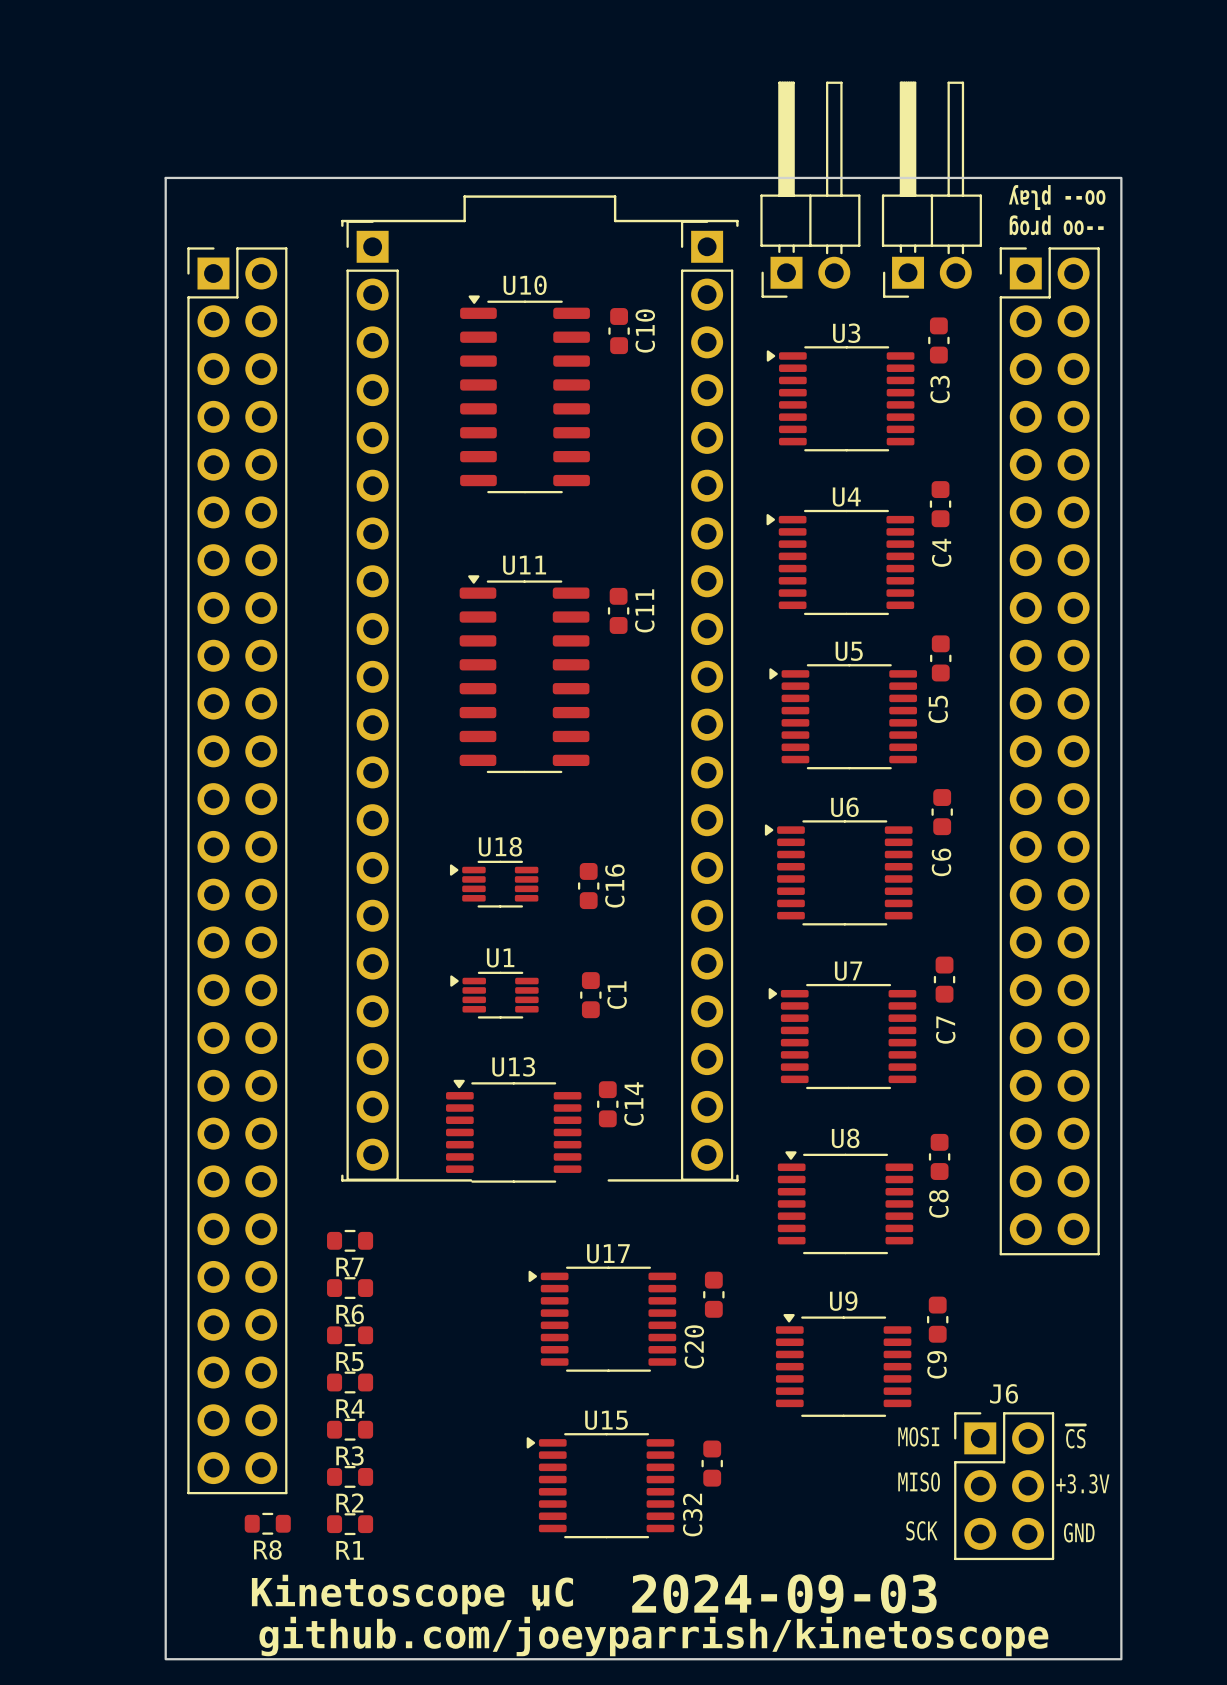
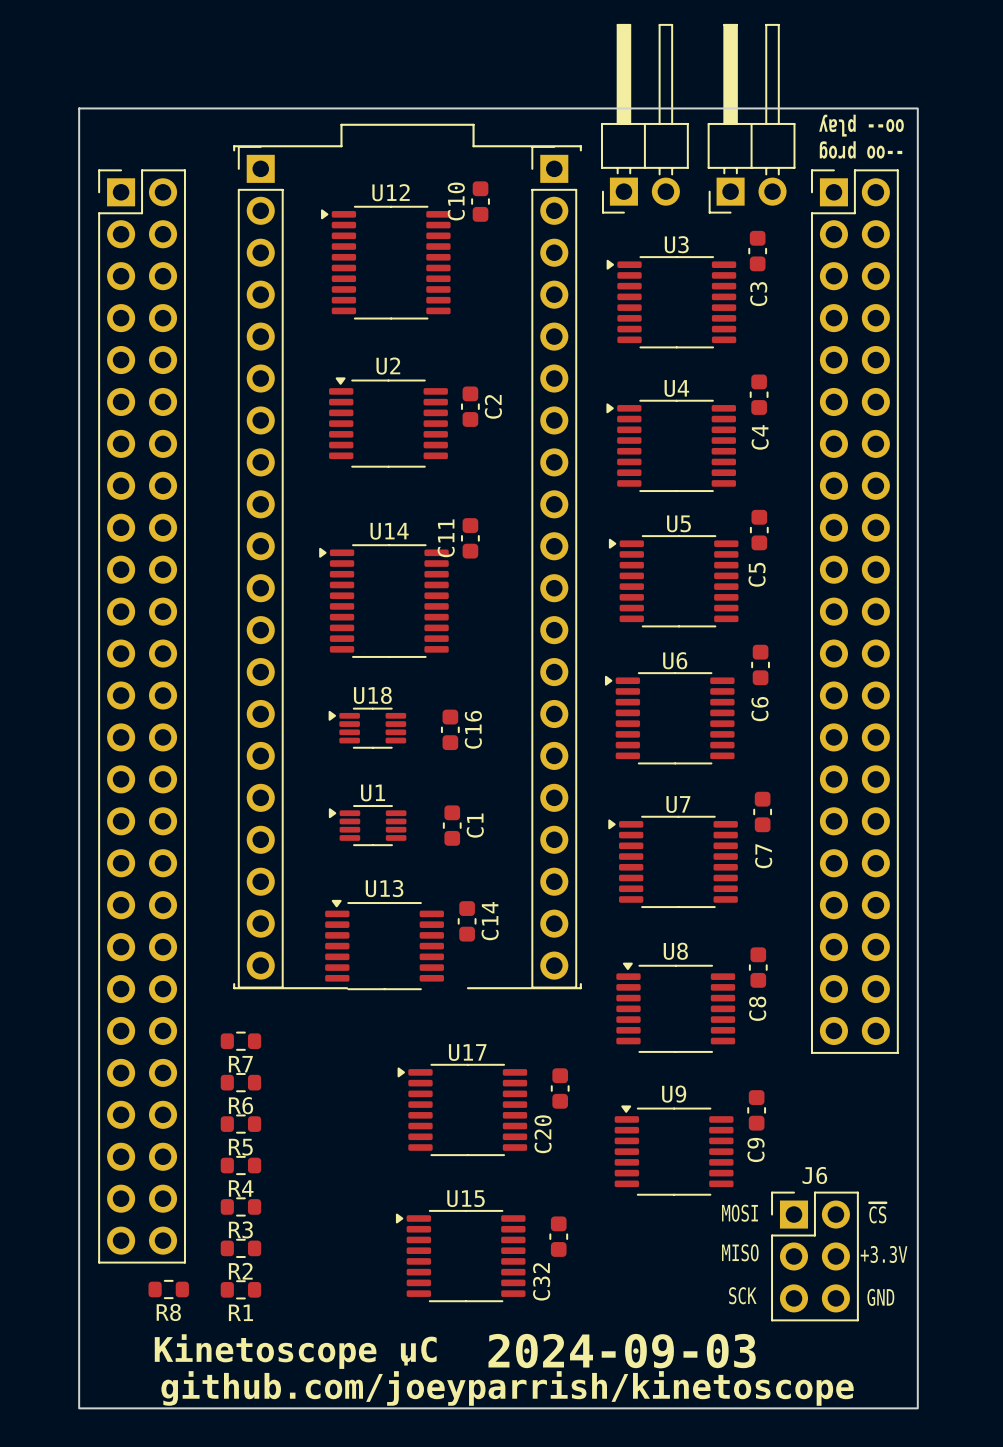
C10 position: (619, 331) -> (480, 201)
C10 name position: C10 (645, 331) -> C10 (456, 201)
U12: none -> (385, 262)
U10: (525, 394) -> none
C2: none -> (470, 406)
U2: none -> (388, 422)
C11 position: (618, 610) -> (470, 538)
C11 name position: C11 (644, 610) -> C11 (446, 538)
U11: (524, 674) -> none
U14: none -> (383, 601)

